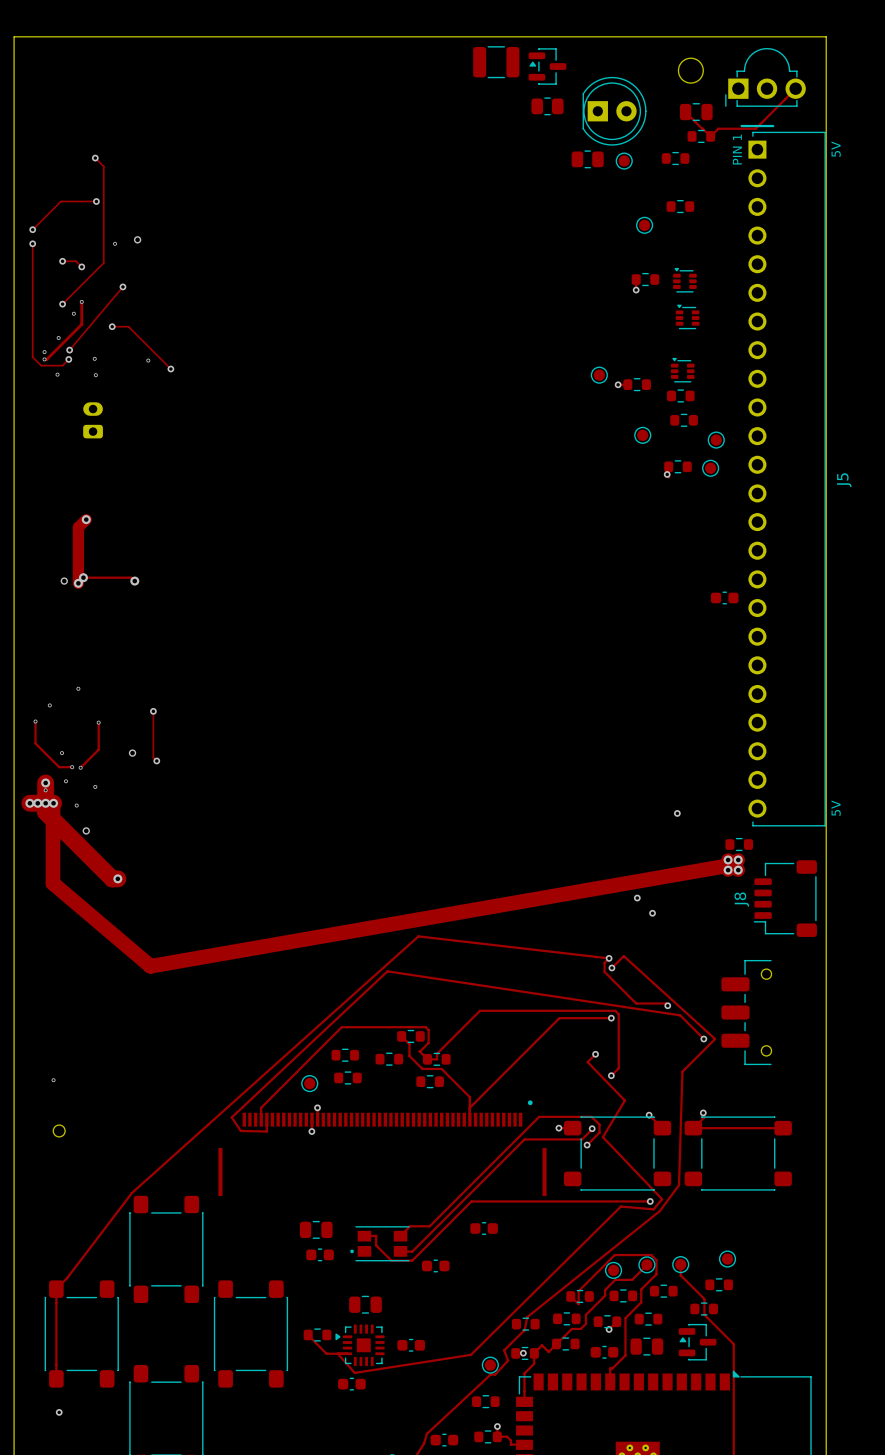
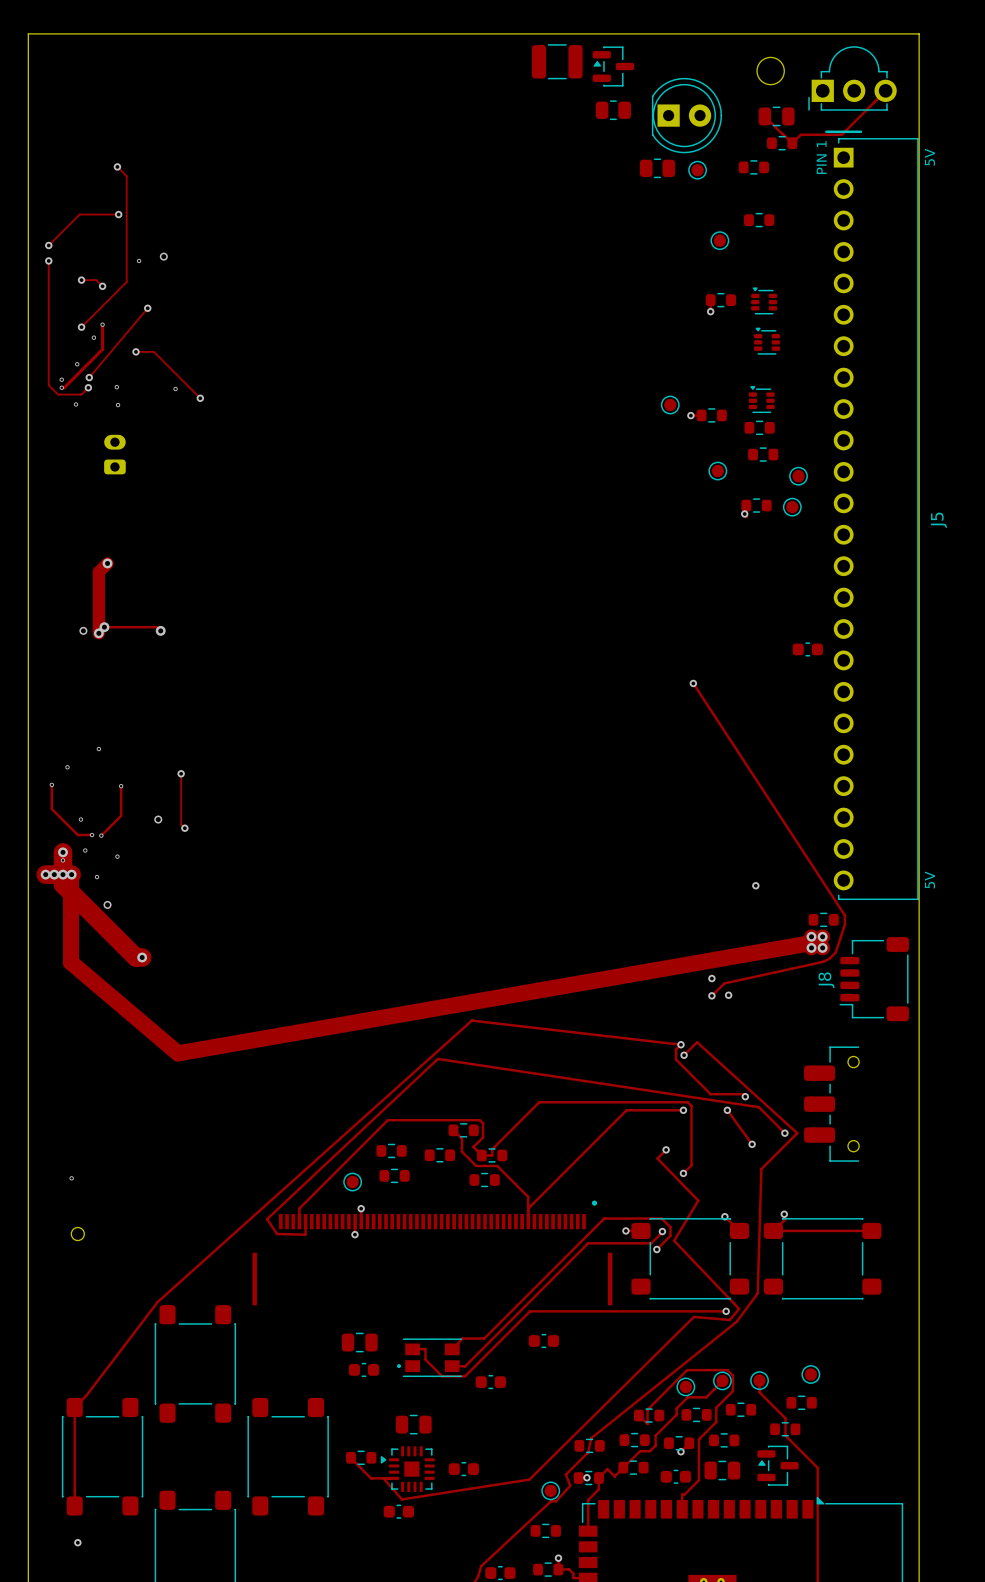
track: none -> (693, 683) (844, 915) (844, 924) (835, 952) (829, 958) (823, 961) (724, 983) (711, 995)
via: none -> (693, 683)
via: none -> (711, 995)
track: none -> (727, 1110) (752, 1144)
via: none -> (727, 1110)
via: none -> (752, 1144)

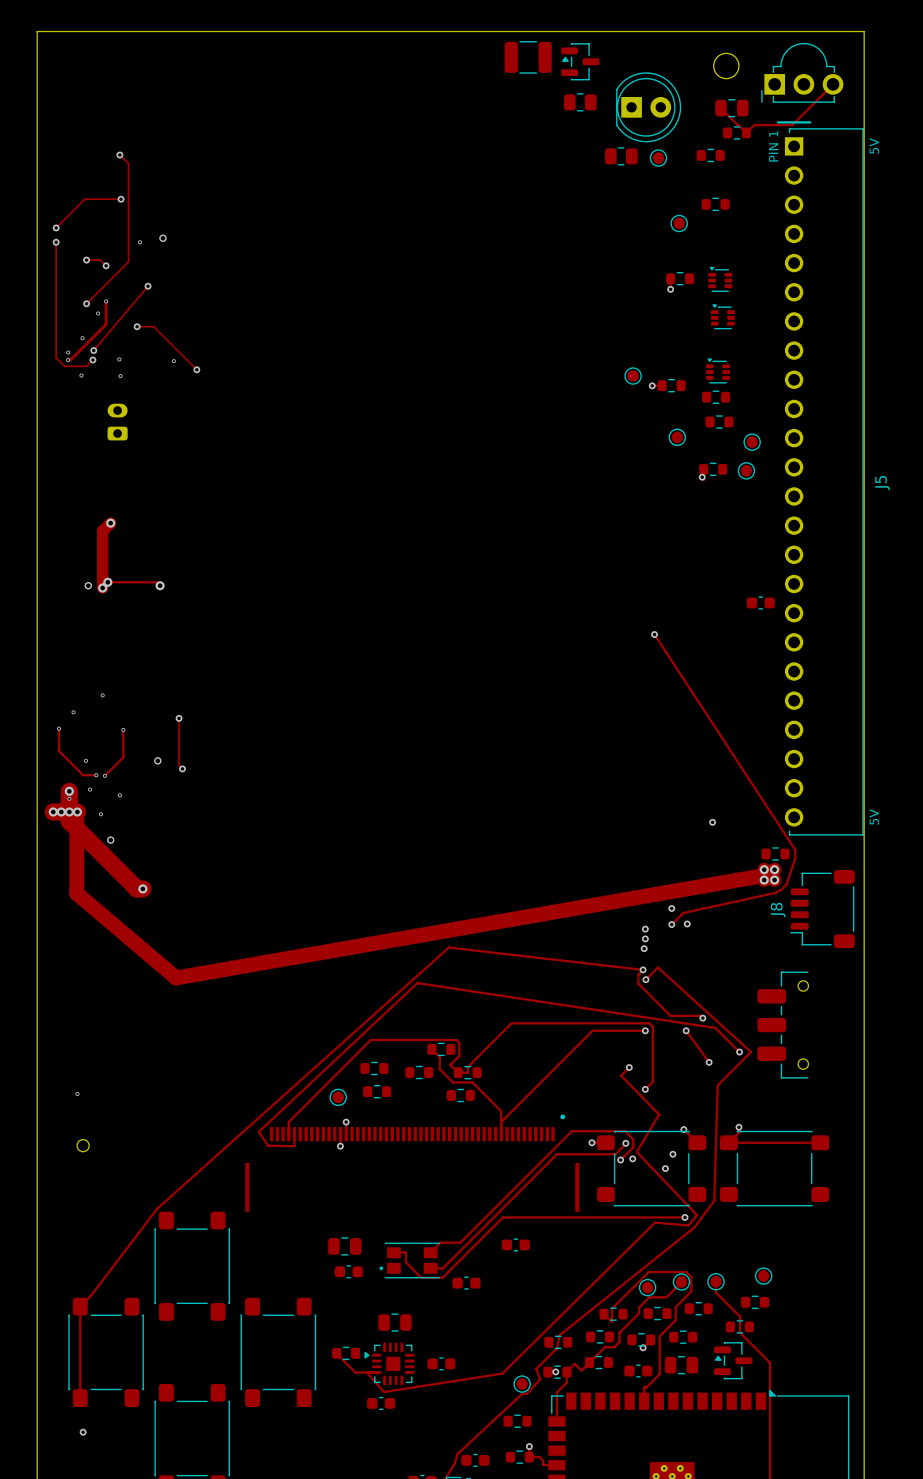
via: none -> (645, 929)
via: none -> (645, 938)
via: none -> (644, 948)
via: none -> (672, 1154)
via: none -> (632, 1158)
via: none -> (665, 1168)

